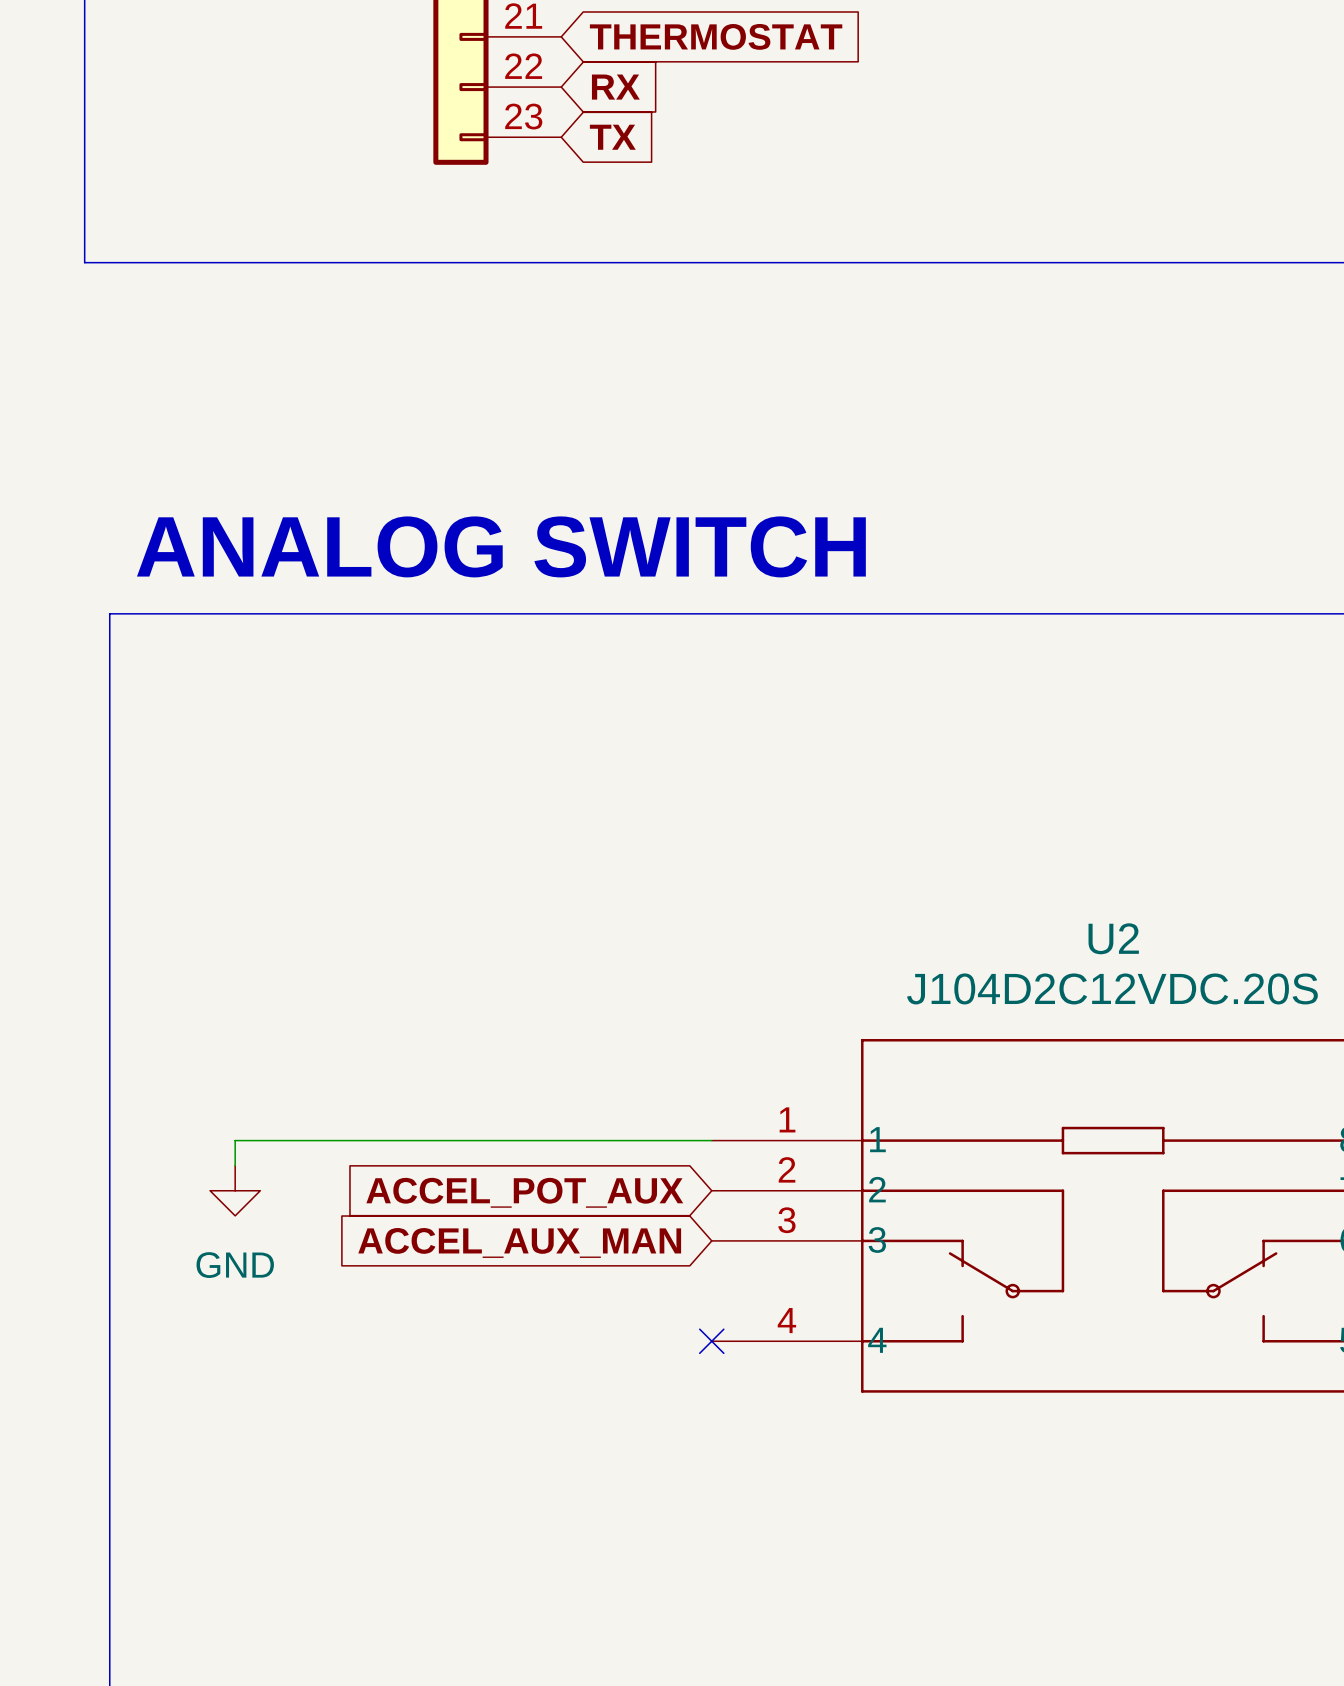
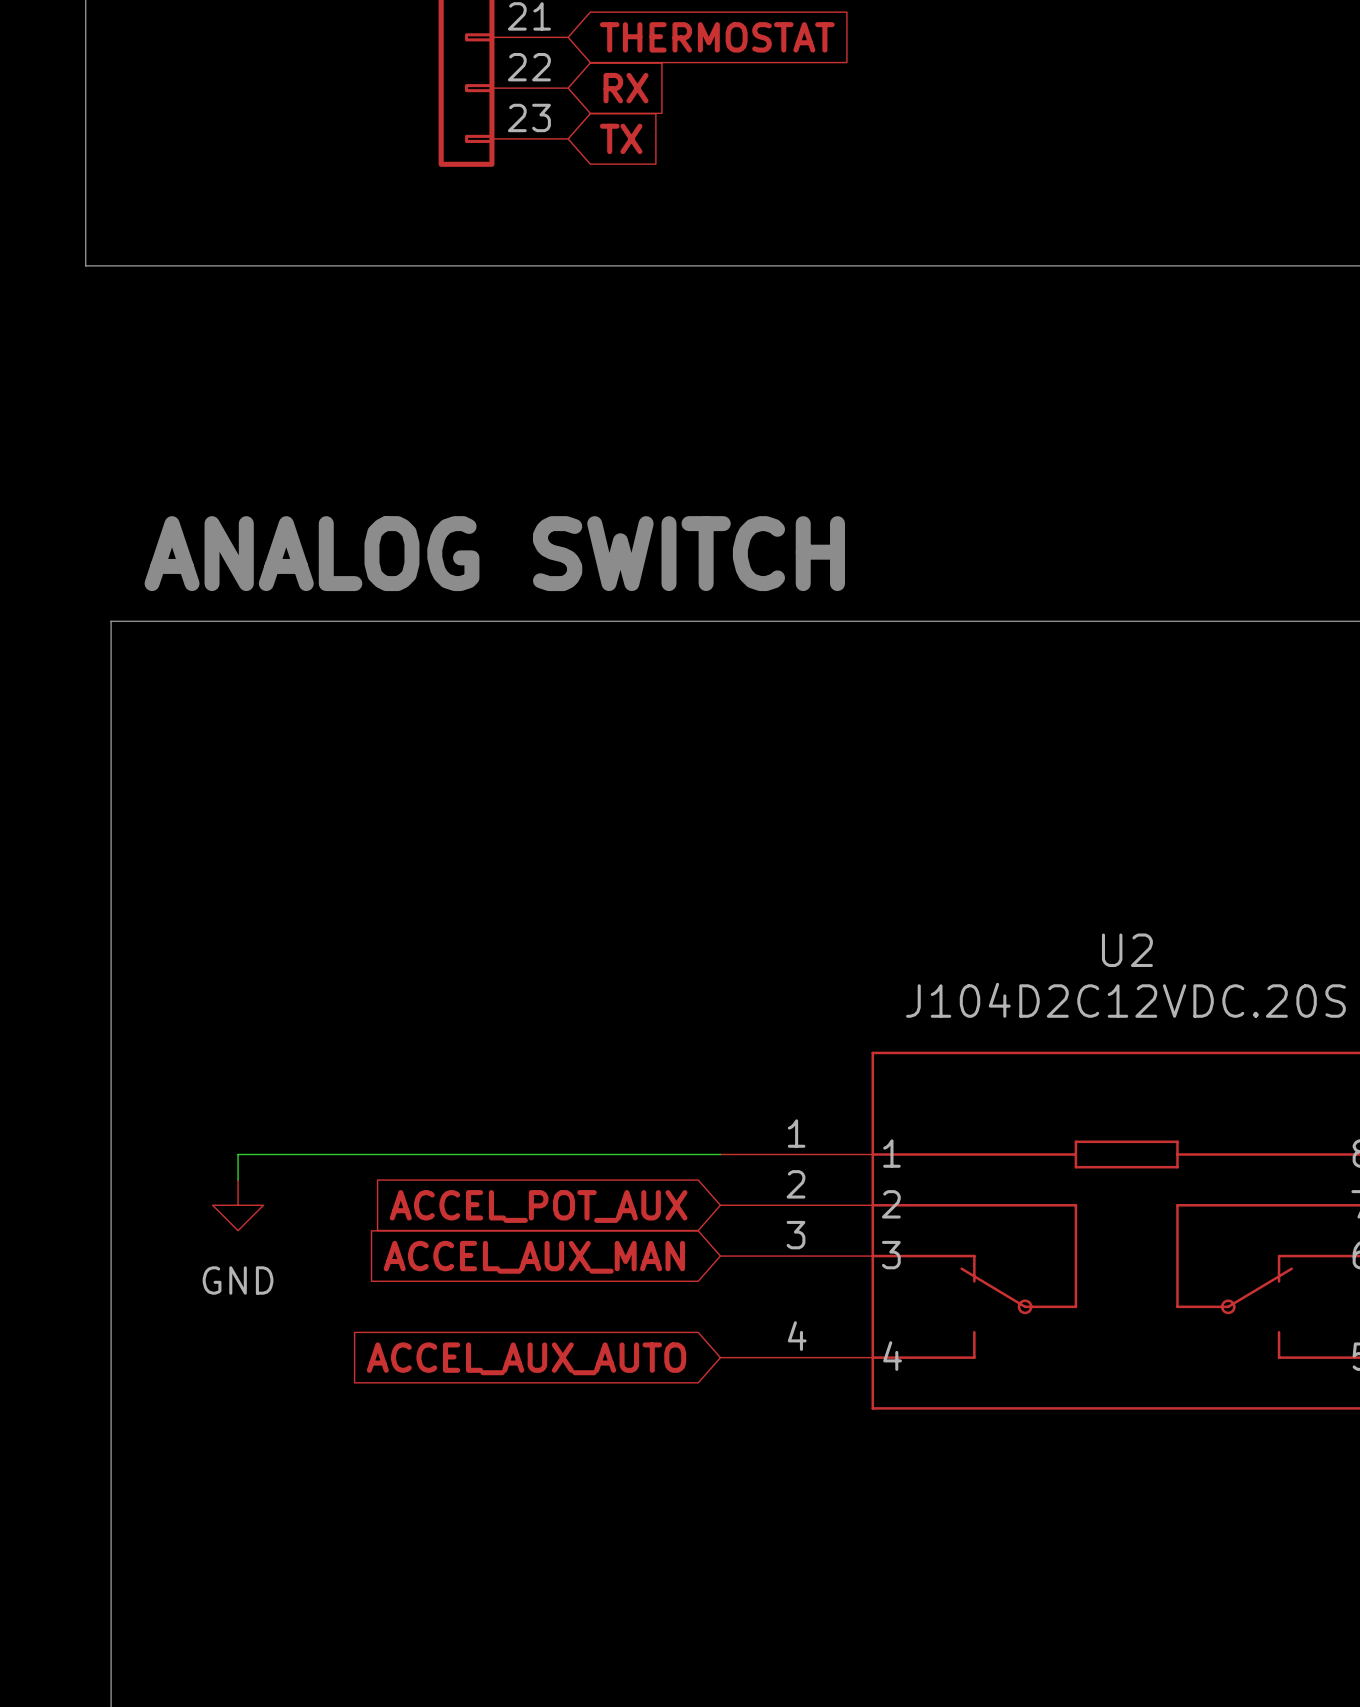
no-connect mark: (711, 1341) -> none
global label: none -> ACCEL_AUX_AUTO (526, 1358)

